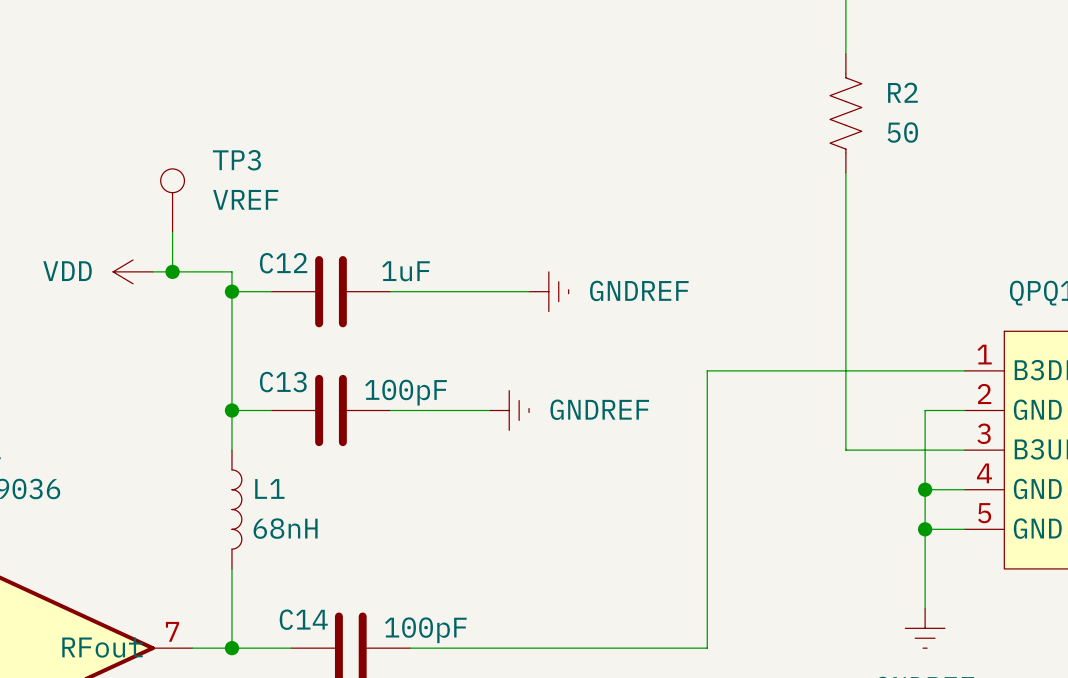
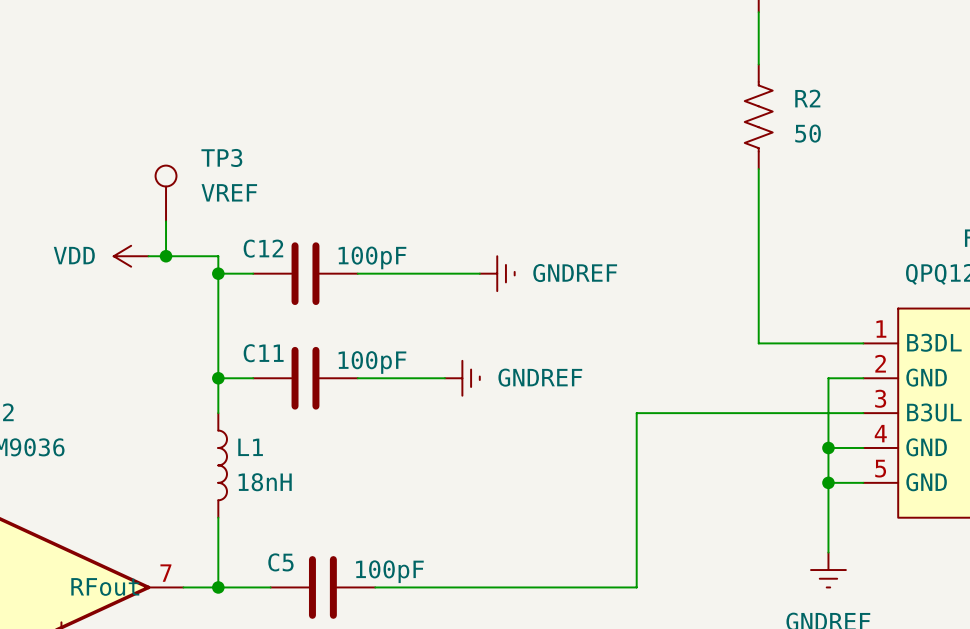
C12 value: 1uF (406, 271) -> 100pF (372, 257)
C13 name: C13 (283, 382) -> C11 (263, 353)
wire: (707, 450) (707, 370) (845, 370) (845, 450) -> (636, 413) (758, 413)
L1 value: 68nH (285, 528) -> 18nH (265, 482)
C14 name: C14 (303, 619) -> C5 (280, 562)

